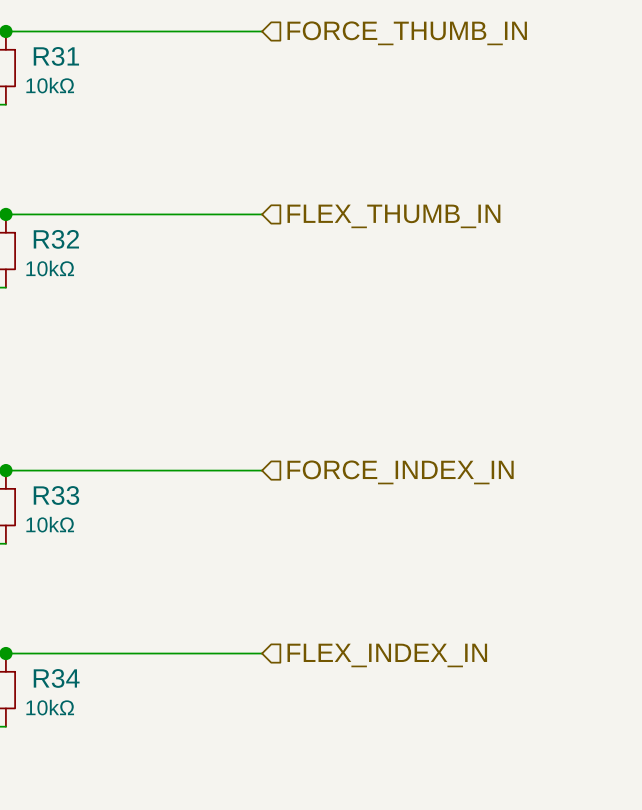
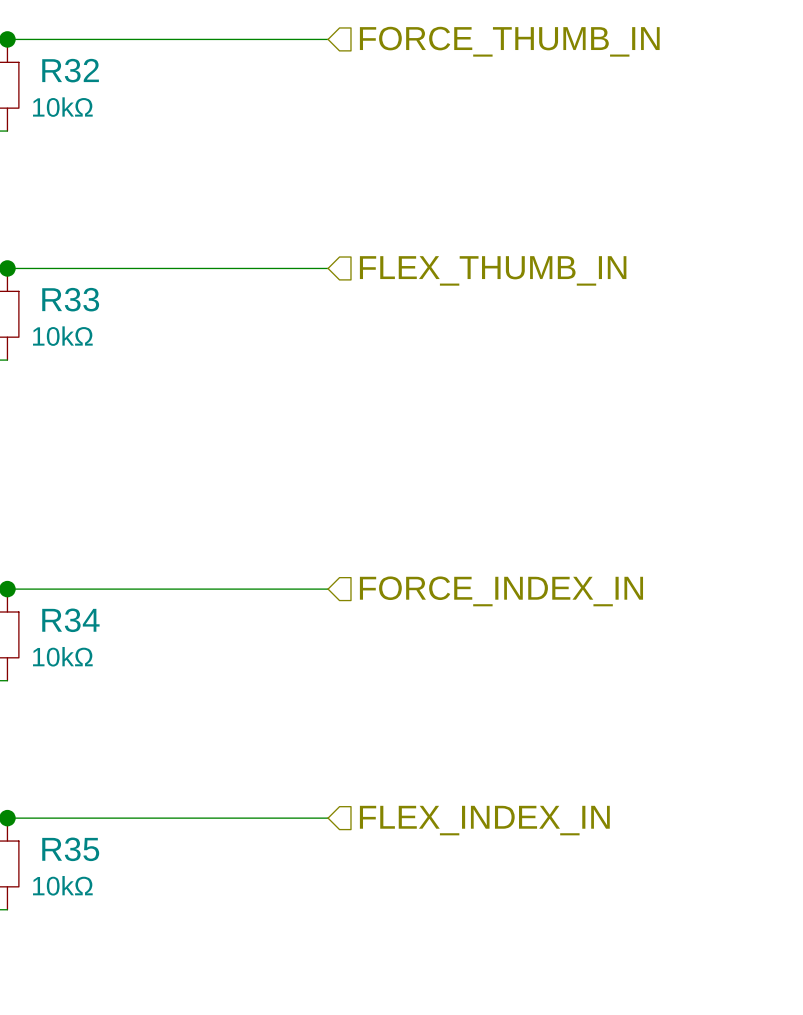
R31 name: R31 (56, 56) -> R32 (70, 70)
R32 name: R32 (56, 239) -> R33 (70, 299)
R33 name: R33 (56, 495) -> R34 (70, 620)
R34 name: R34 (56, 678) -> R35 (70, 849)

